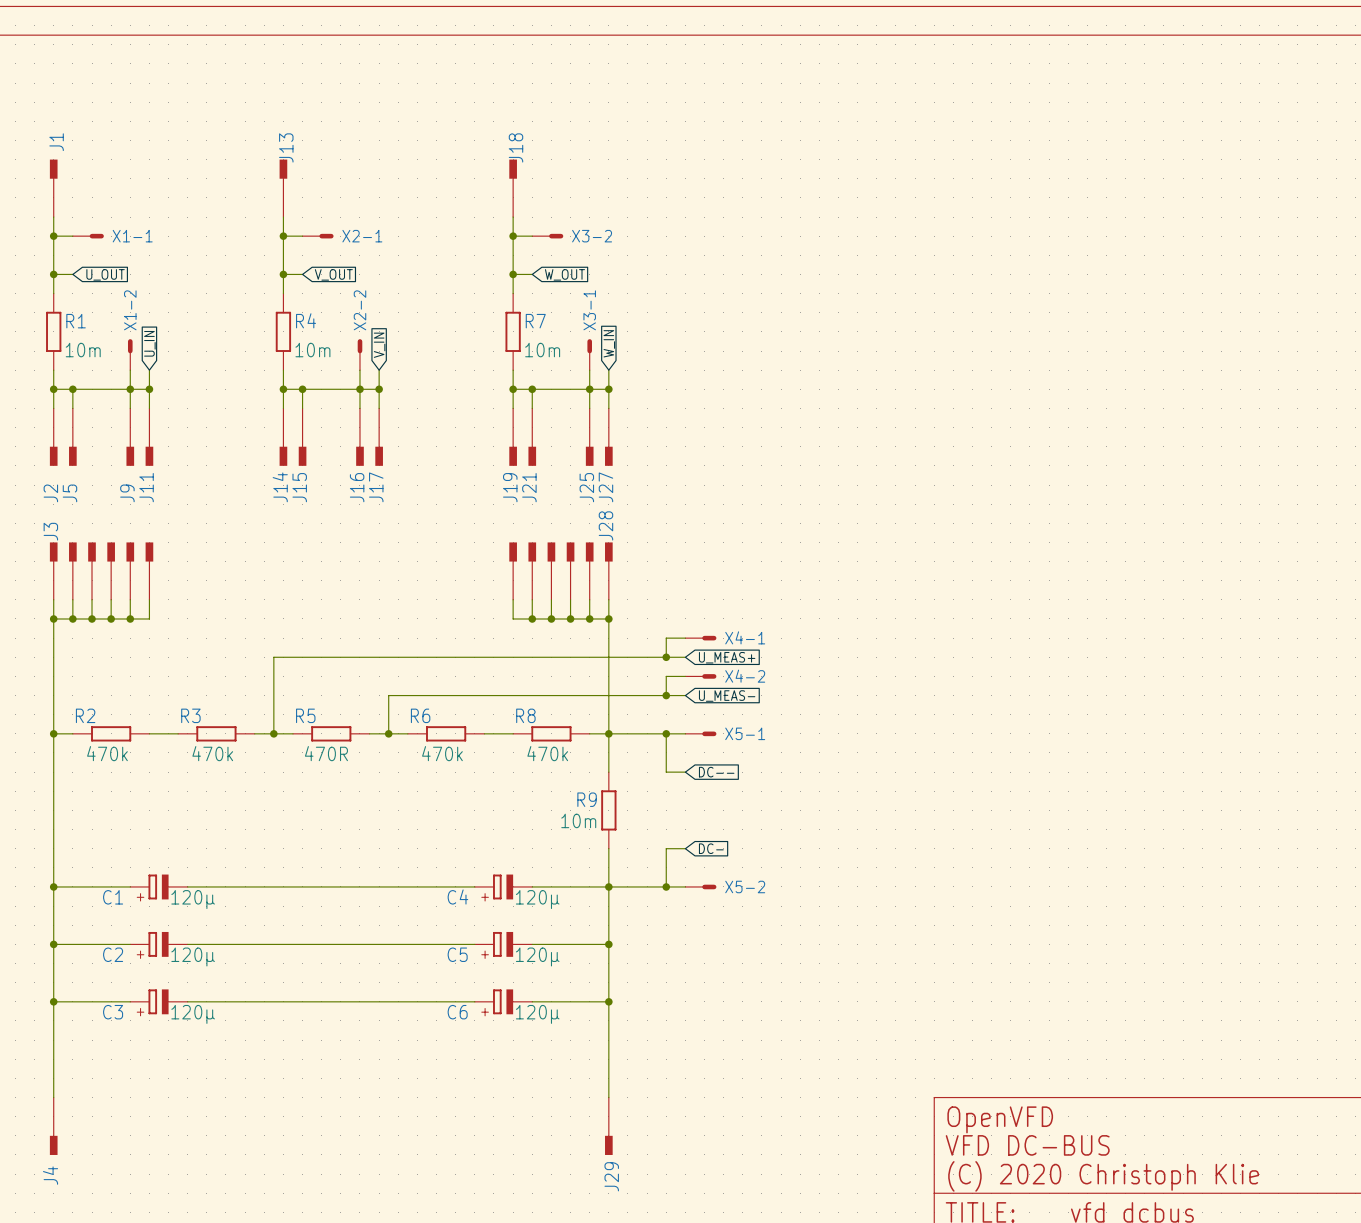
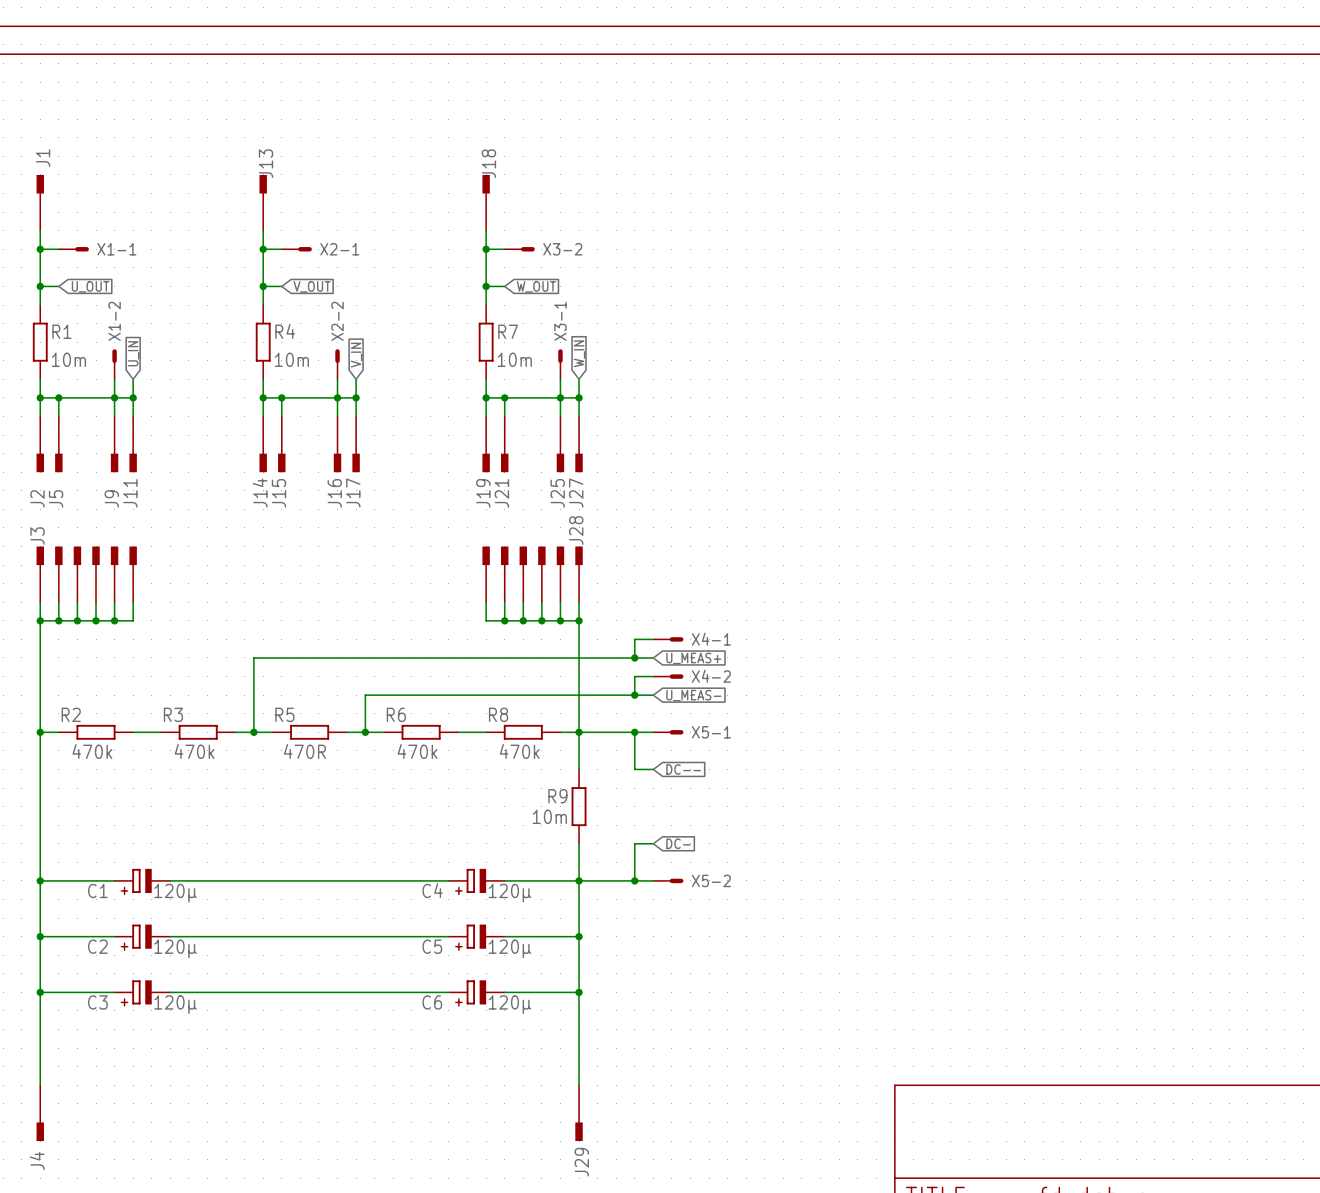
text: OpenVFD (1000, 1119) -> none
text: VFD DC-BUS (1027, 1145) -> none
text: (C) 2020 Christoph Klie (1103, 1176) -> none

